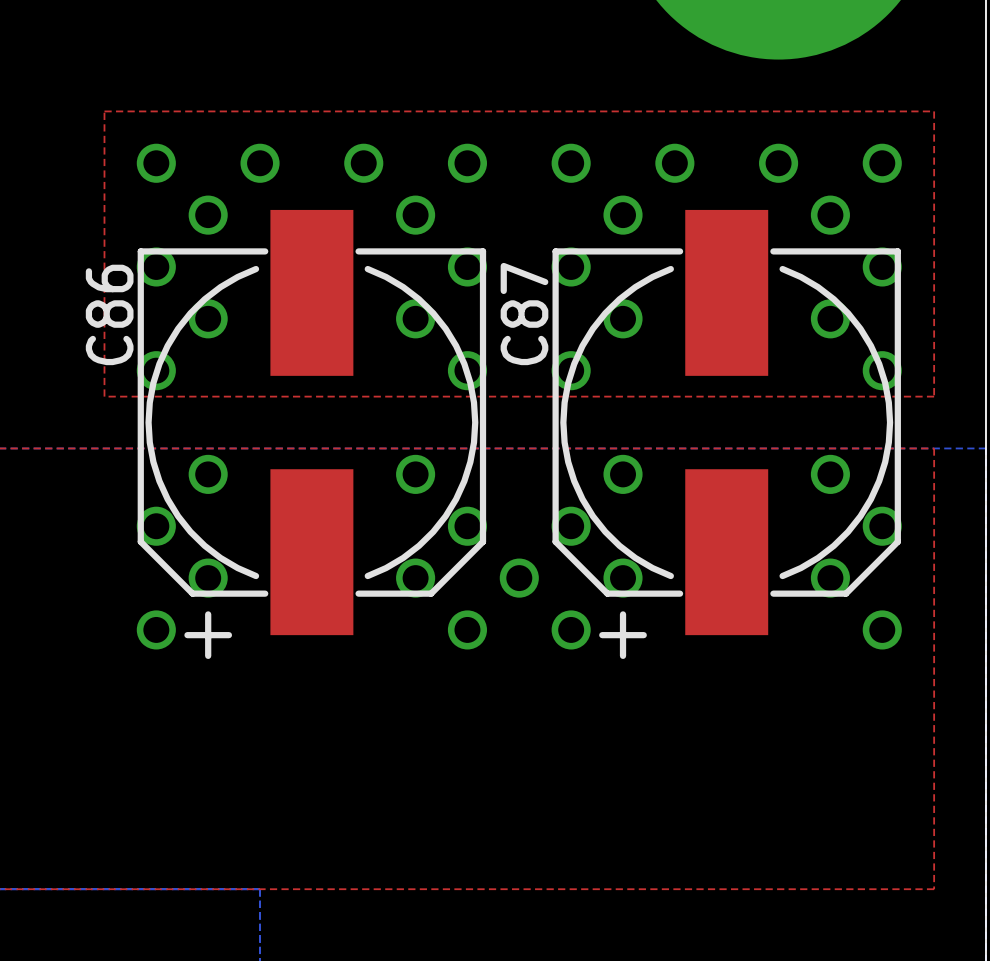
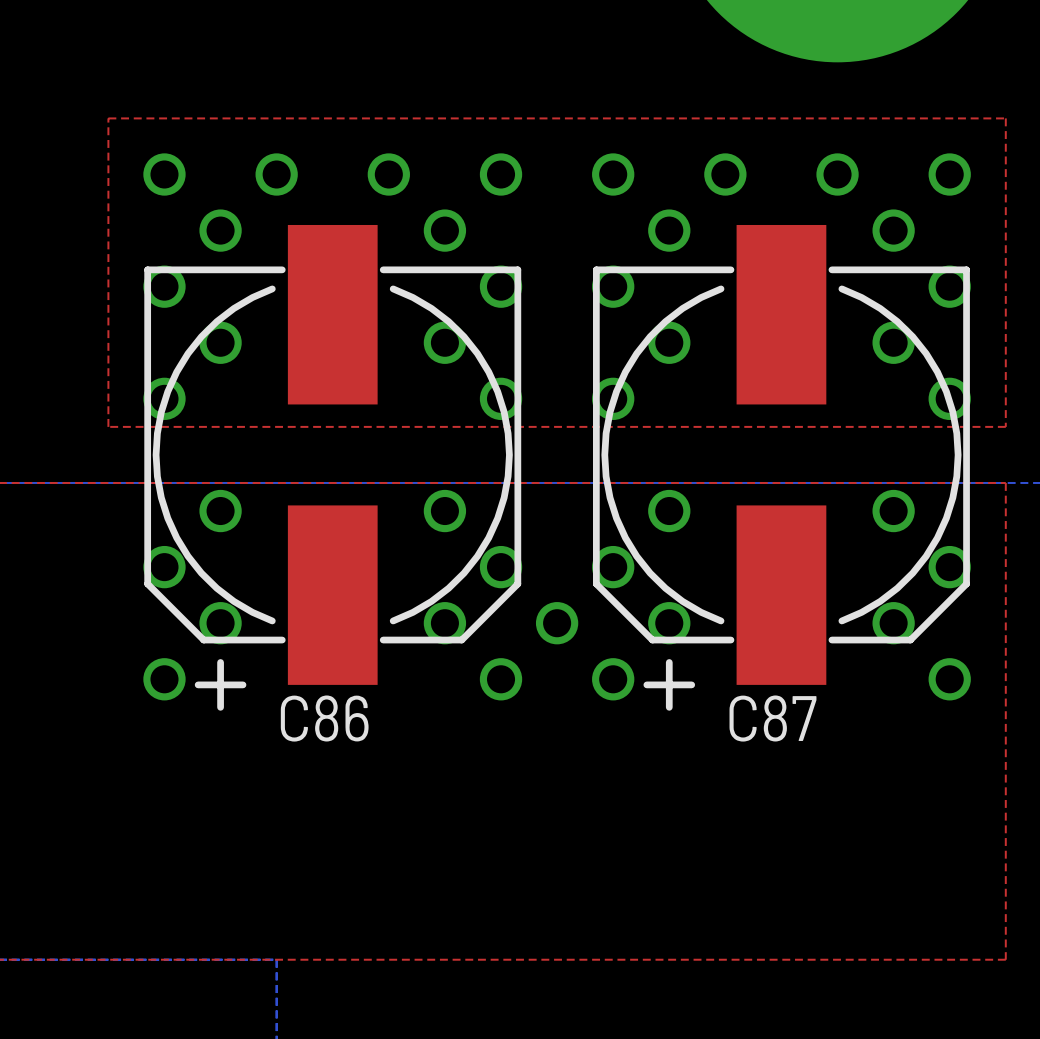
C86 name rotation: 0° (109, 314) -> 90° clockwise (324, 718)
C86 name position: C86 (109, 314) -> C86 (324, 718)
C87 name rotation: 0° (524, 314) -> 90° clockwise (772, 718)
C87 name position: C87 (524, 314) -> C87 (772, 718)

